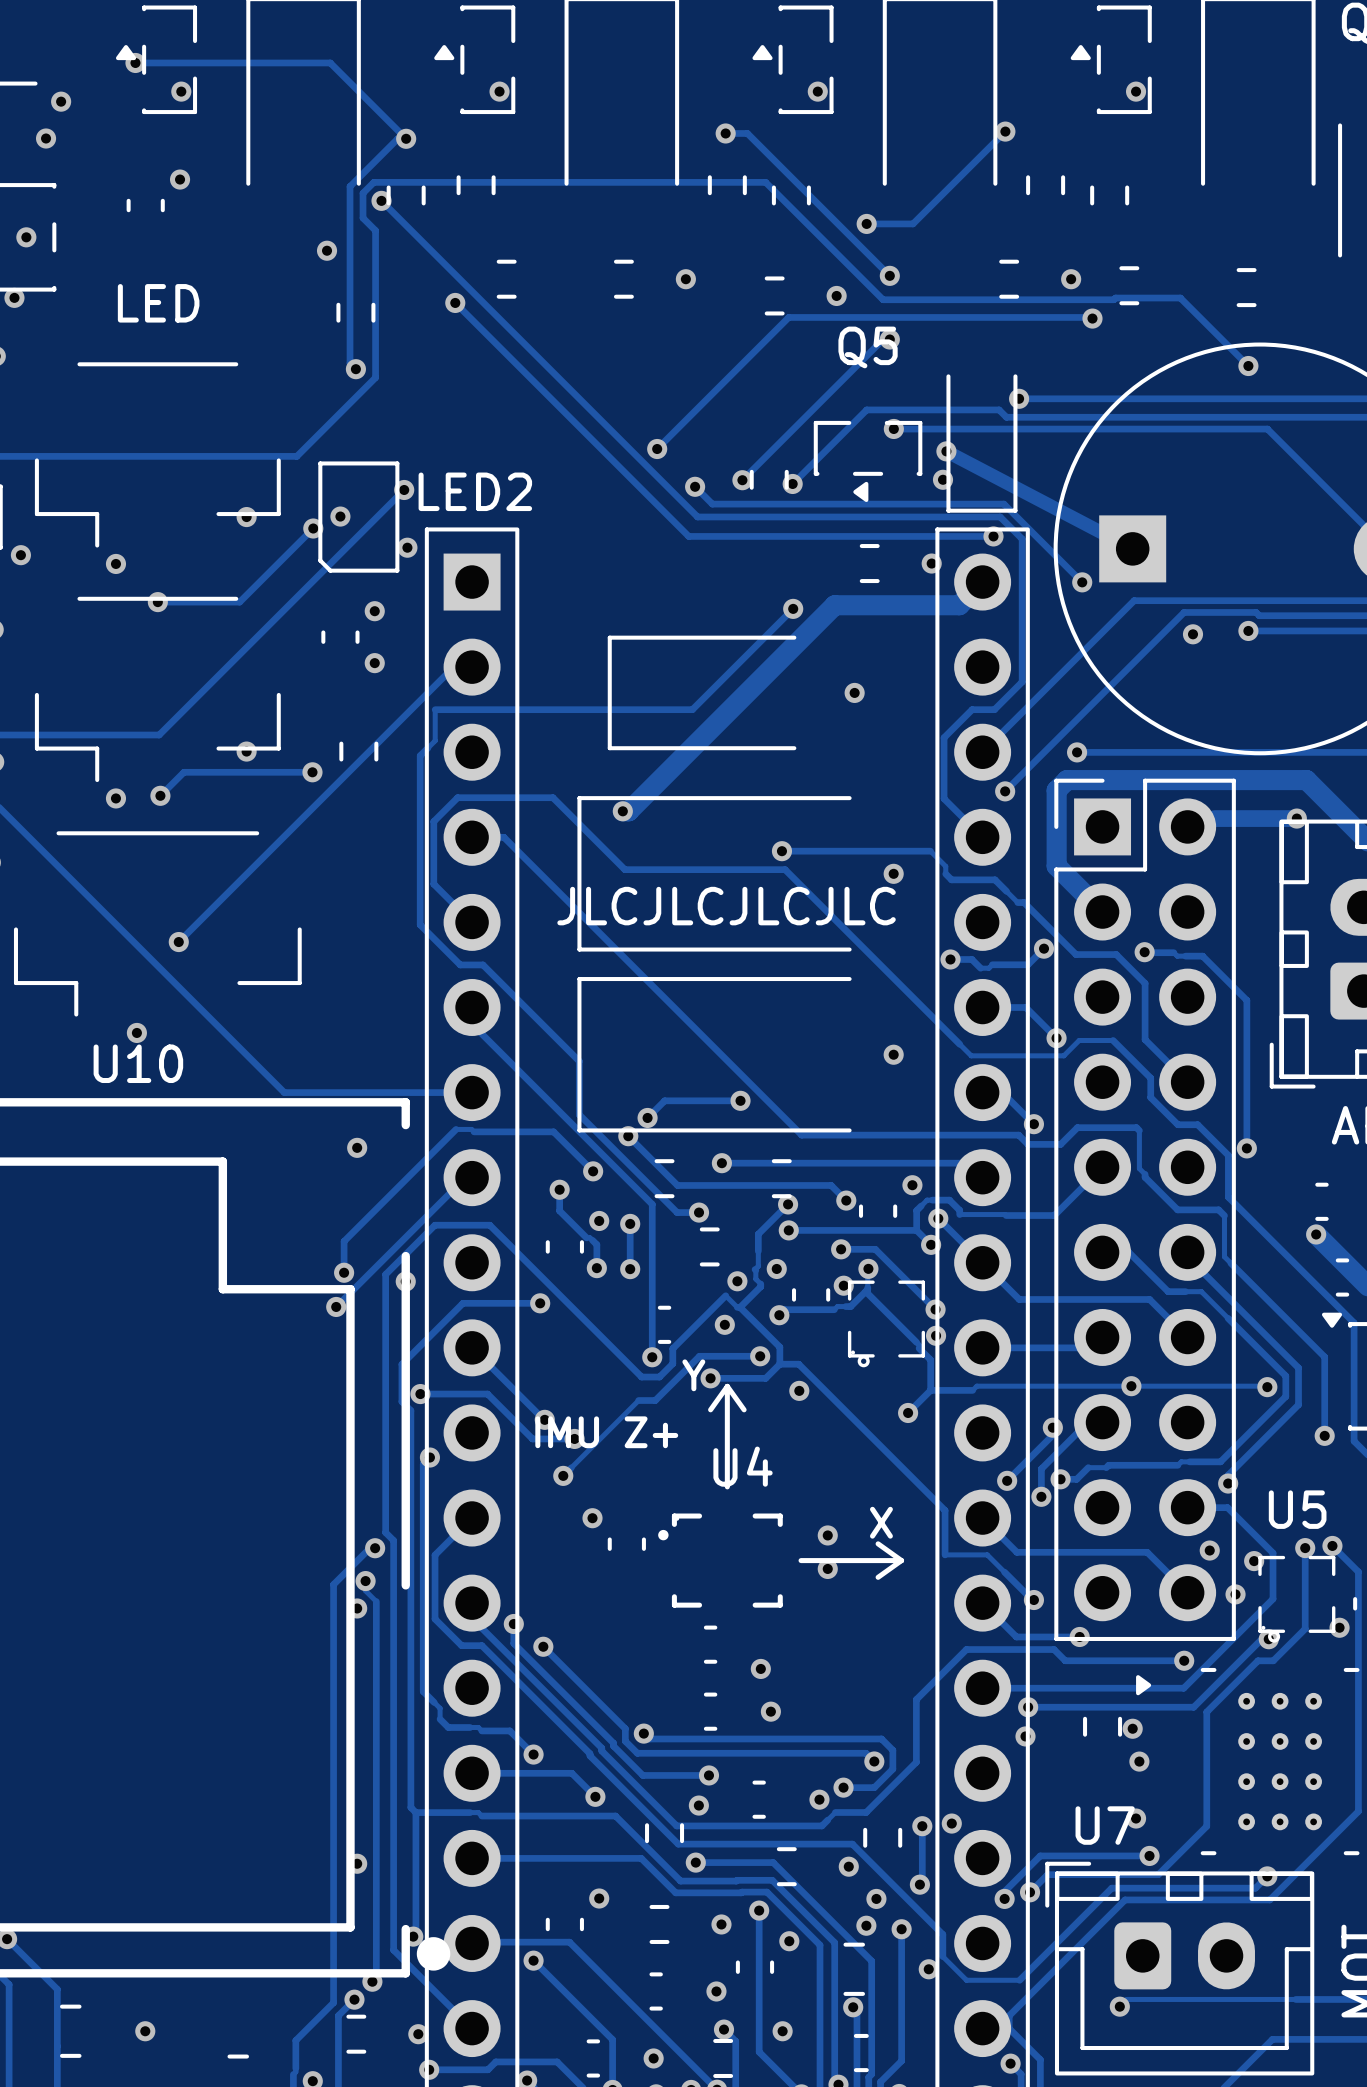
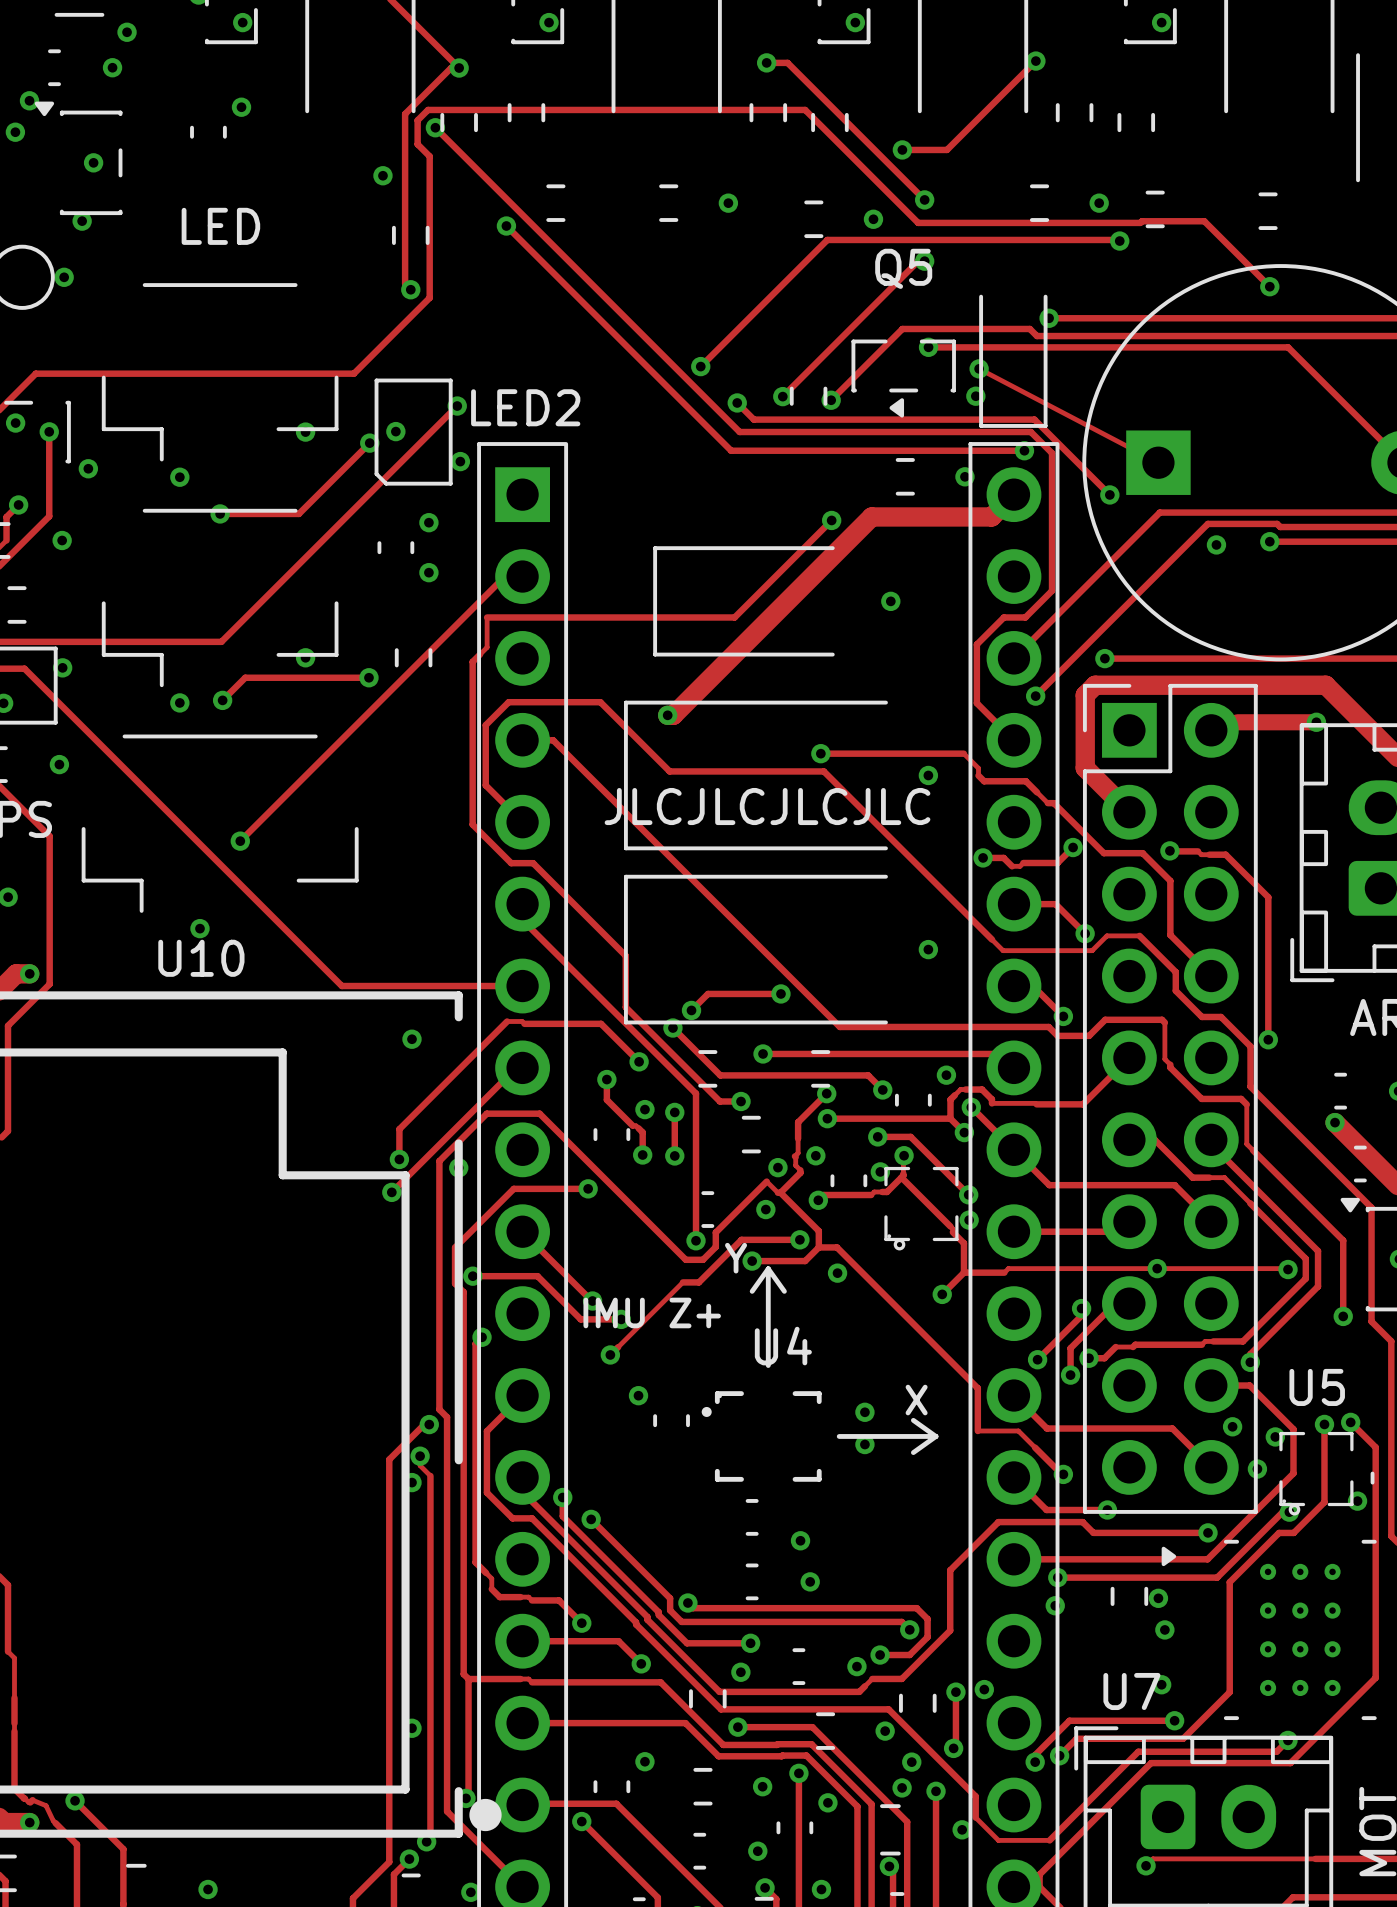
track width: thick (946, 451) (1132, 548) -> thin (979, 368) (1158, 462)

